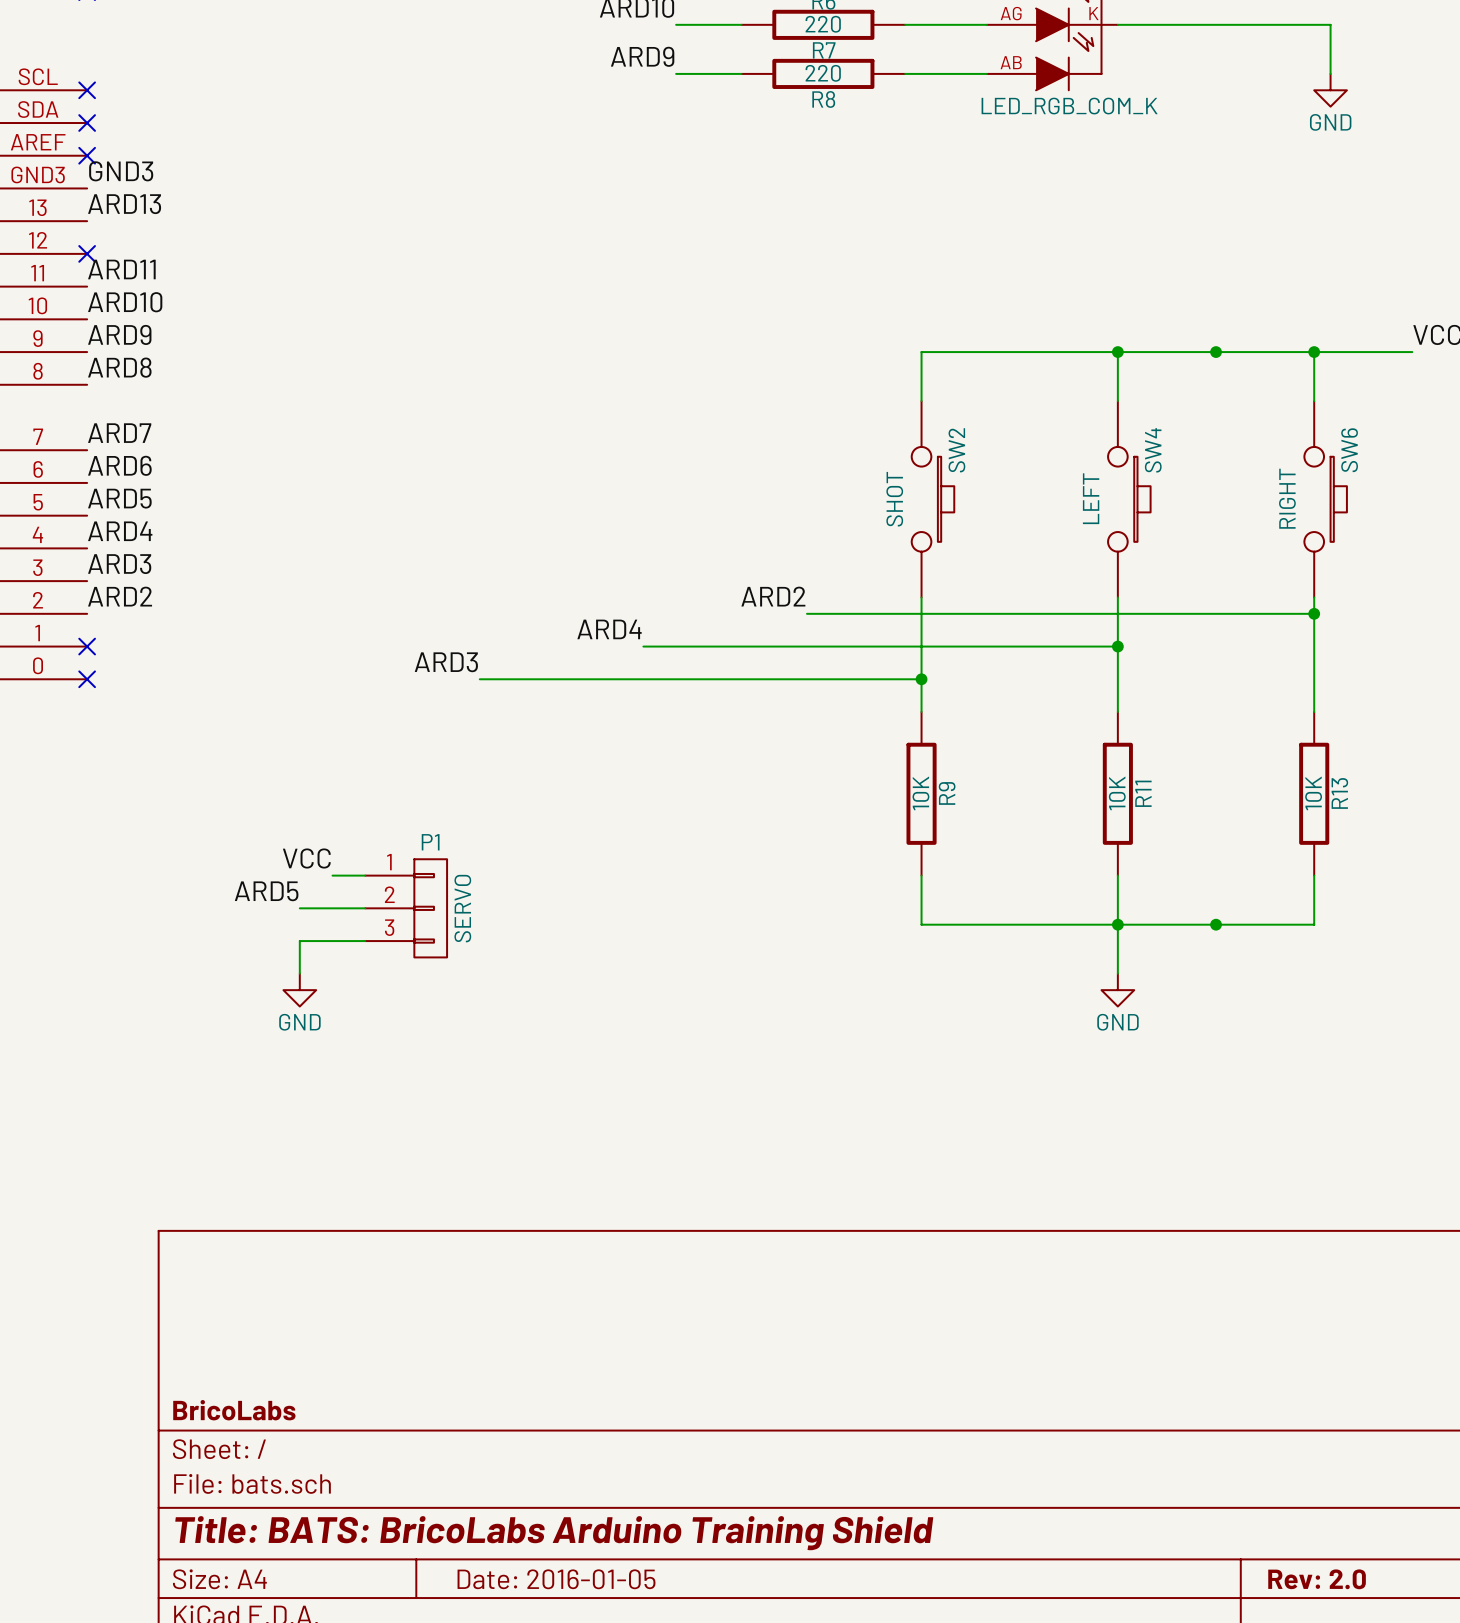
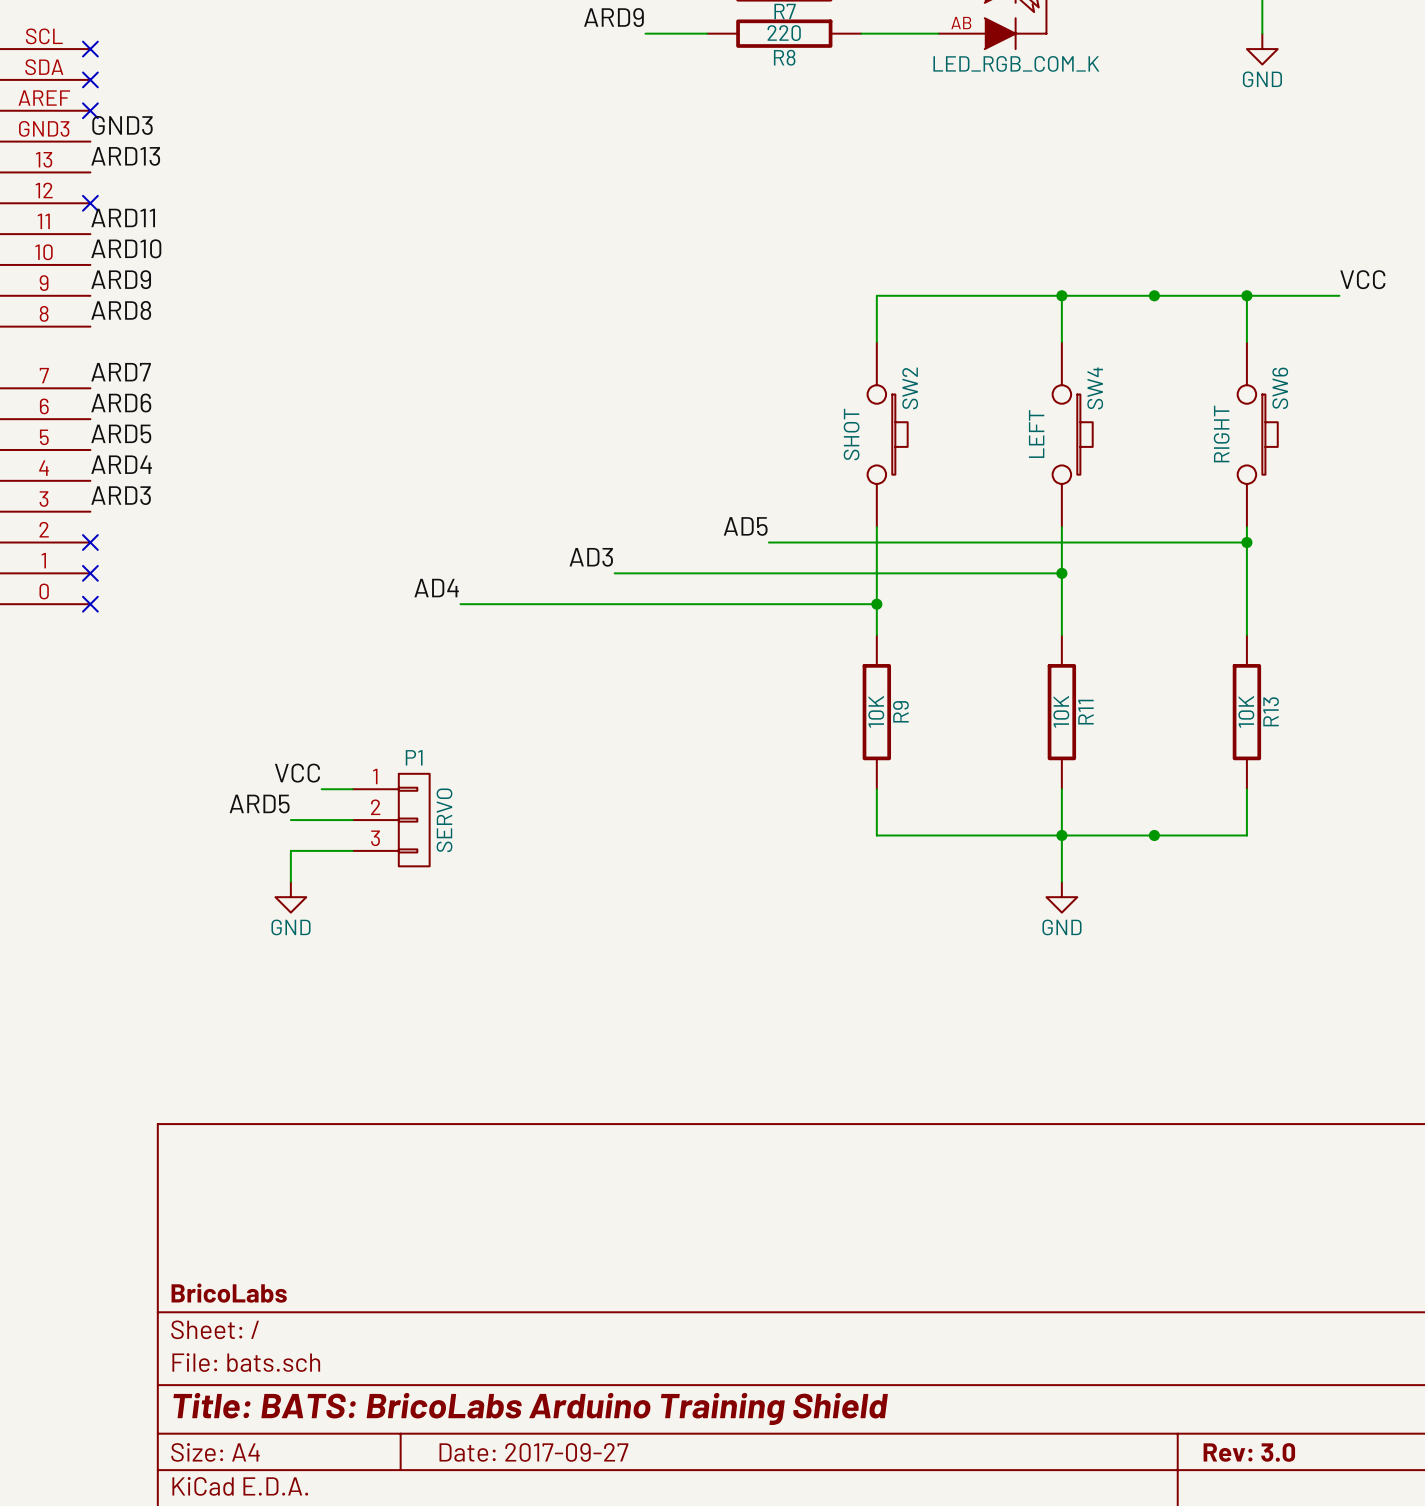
label: ARD2 (120, 596) -> none
label: ARD2 (773, 596) -> AD5 (745, 526)
no-connect mark: none -> (90, 542)
label: ARD4 (609, 629) -> AD3 (591, 557)
label: ARD3 (446, 662) -> AD4 (436, 588)
title block: Date: 2016-01-05 (556, 1579) -> Date: 2017-09-27 (533, 1452)
title block: Rev: 2.0 (1317, 1579) -> Rev: 3.0 (1249, 1452)

